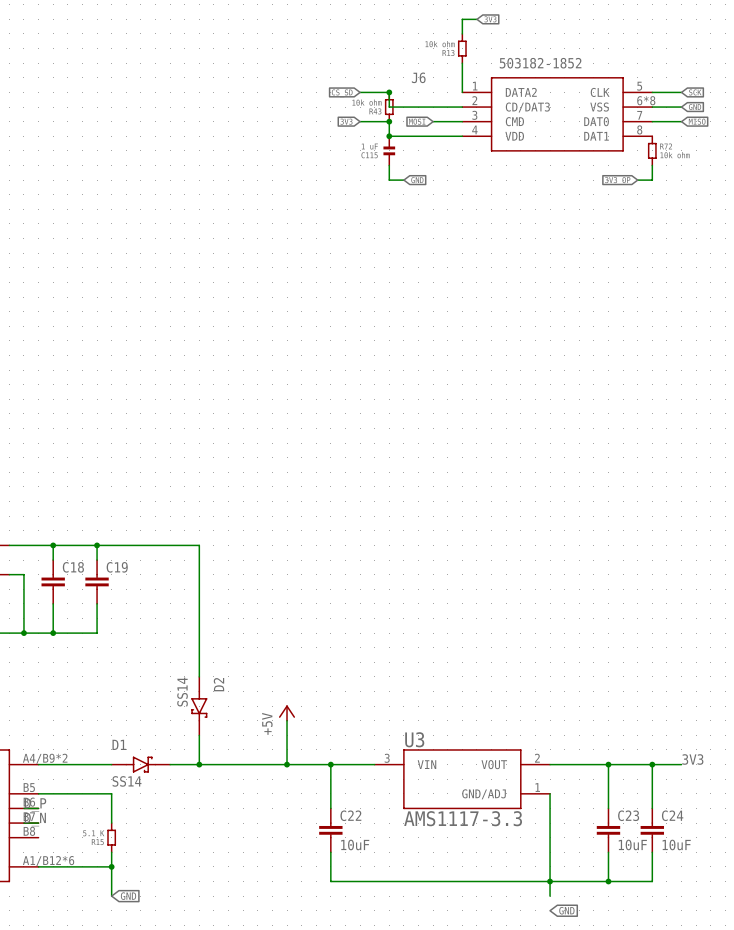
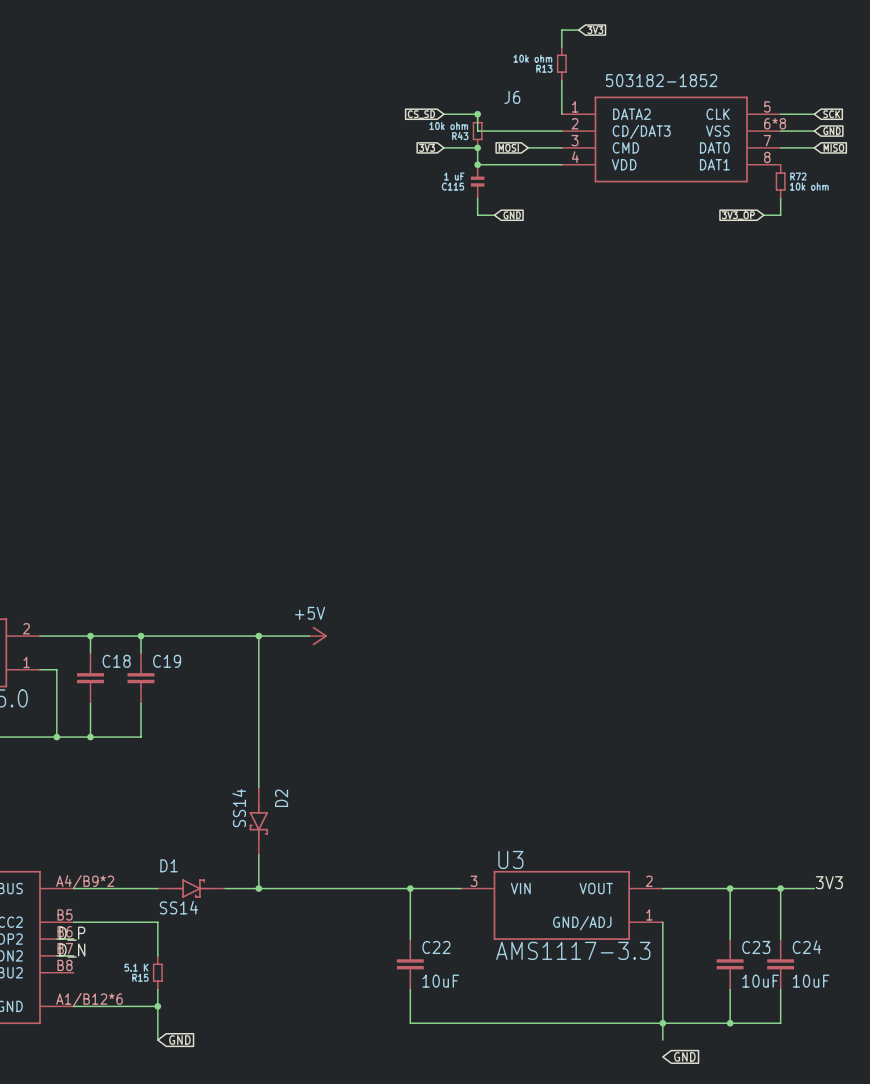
wire: none -> (258, 636) (309, 636)
junction: none -> (258, 636)
power symbol: none -> +5V (318, 636)
power symbol: +5V (287, 713) -> none
wire: (287, 720) (287, 764) -> none
junction: (287, 764) -> none

